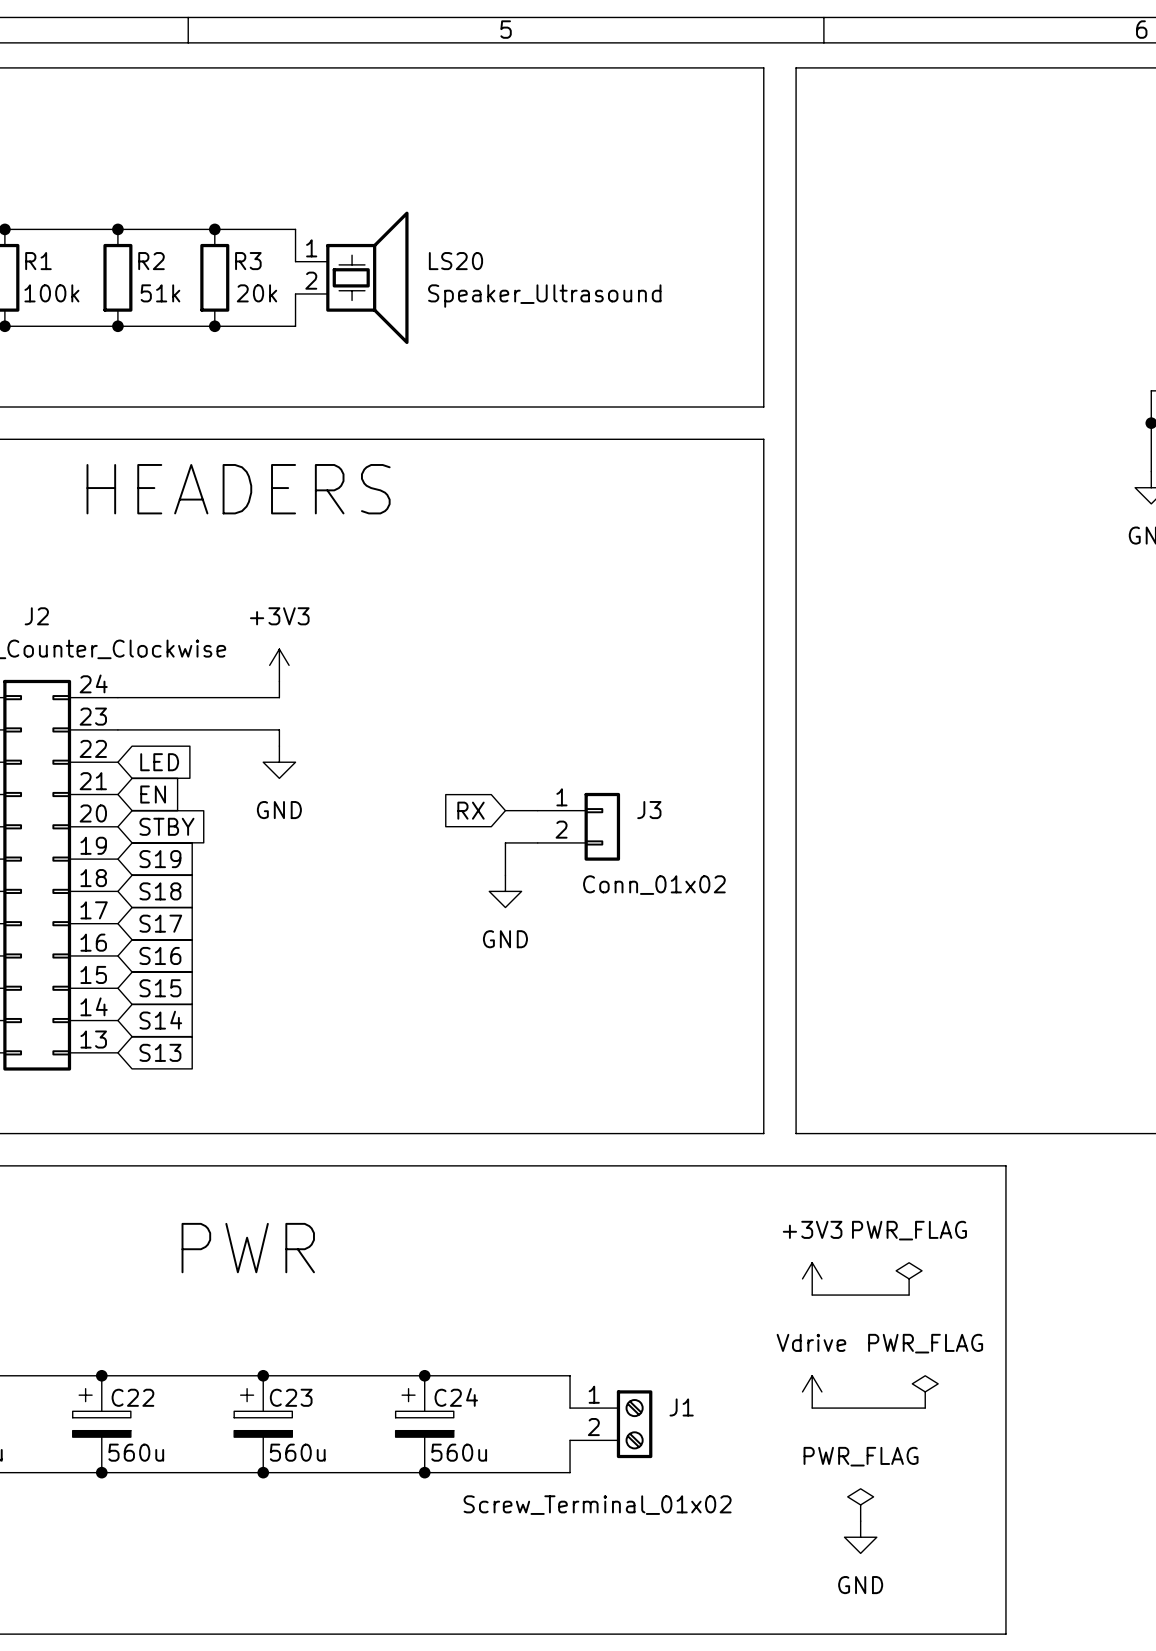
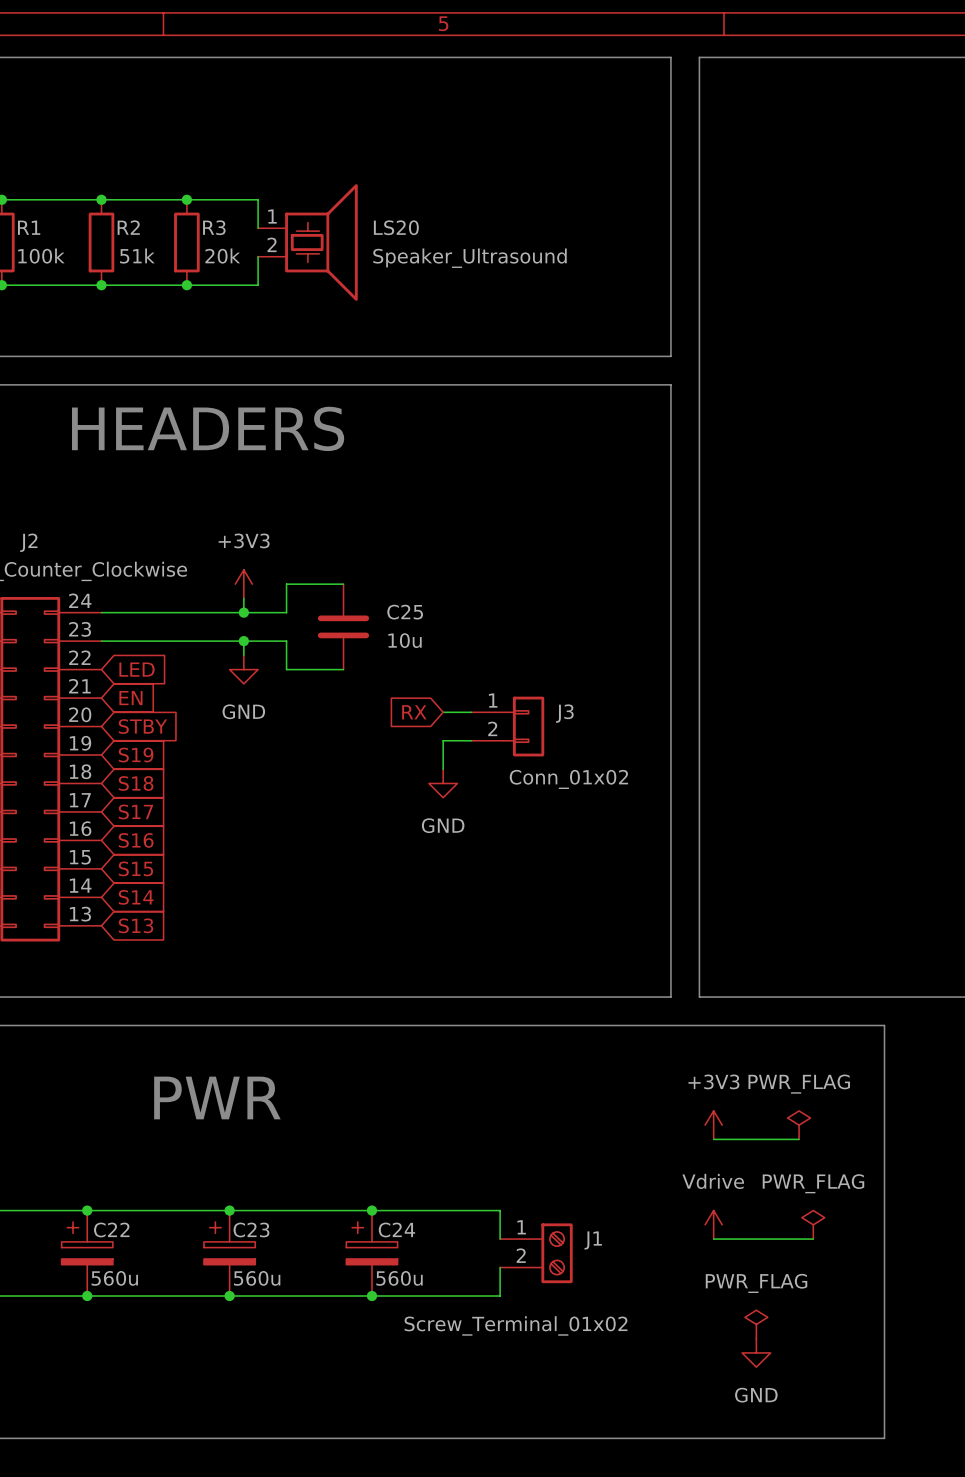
wire: none -> (343, 584) (286, 584) (286, 612) (243, 612)
junction: none -> (243, 612)
C25: none -> 10u (343, 626)
wire: none -> (243, 641) (286, 641) (286, 669) (343, 669)
junction: none -> (243, 641)

